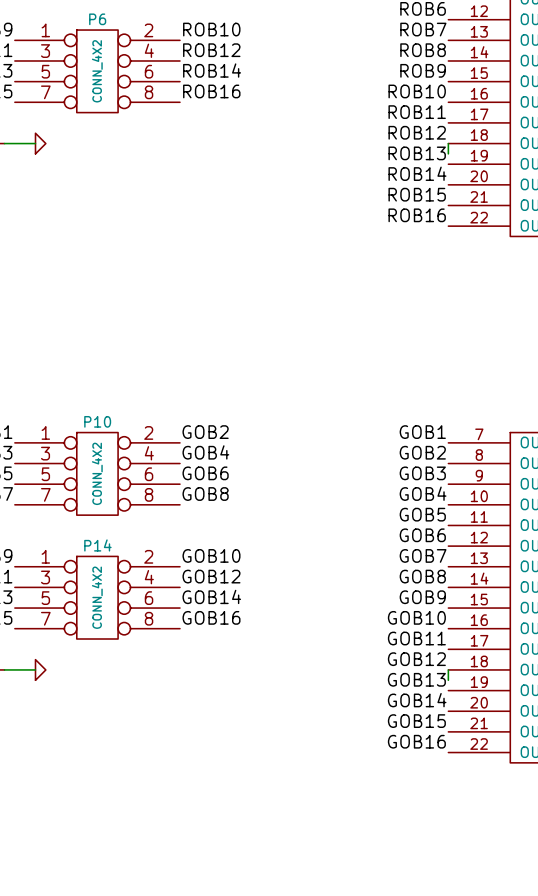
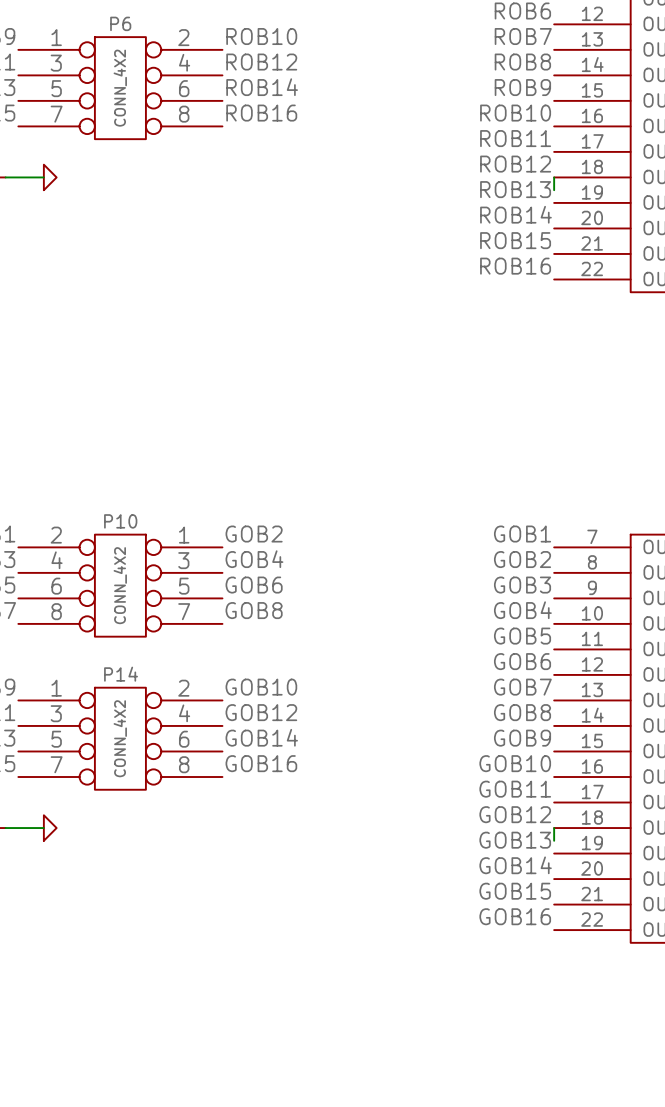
P10 flip: as is (97, 473) -> left-right (120, 585)

